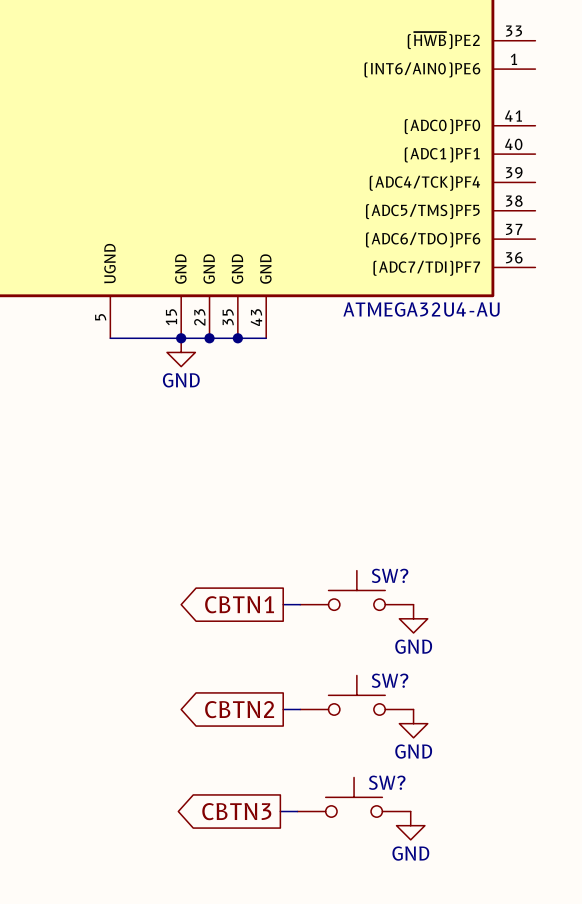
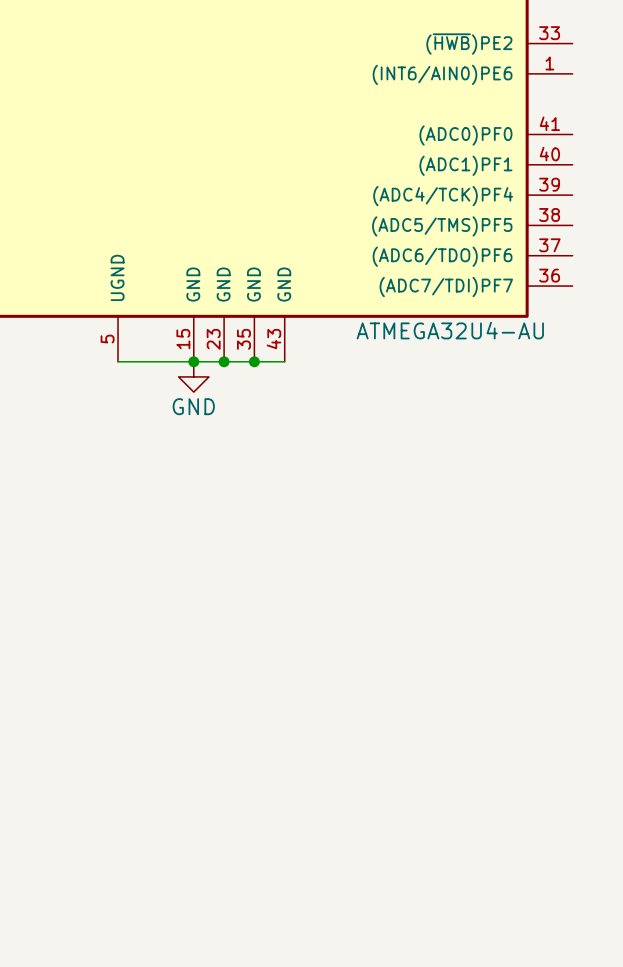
SW?: (356, 590) -> none
global label: CBTN1 (239, 604) -> none
wire: (283, 604) (300, 604) -> none
power symbol: GND (413, 618) -> none
SW?: (356, 695) -> none
global label: CBTN2 (239, 709) -> none
wire: (283, 709) (300, 709) -> none
power symbol: GND (413, 723) -> none
SW?: (354, 797) -> none
global label: CBTN3 (236, 811) -> none
wire: (280, 811) (297, 811) -> none
power symbol: GND (410, 825) -> none

